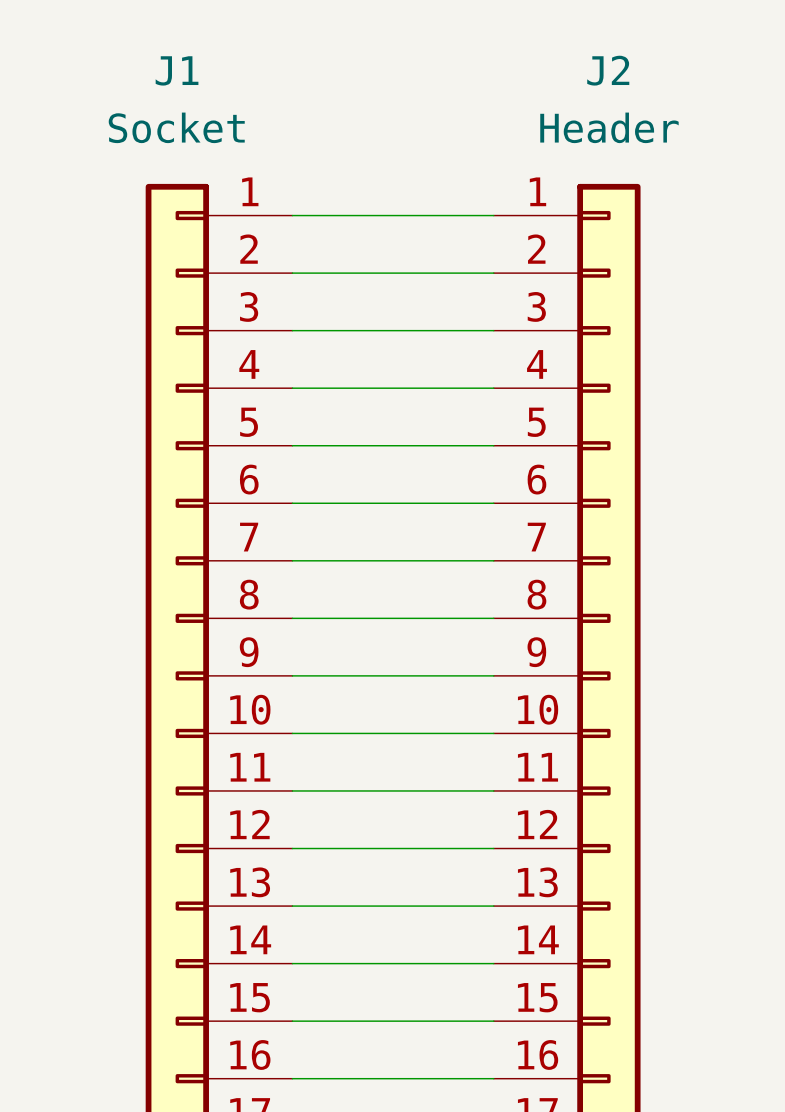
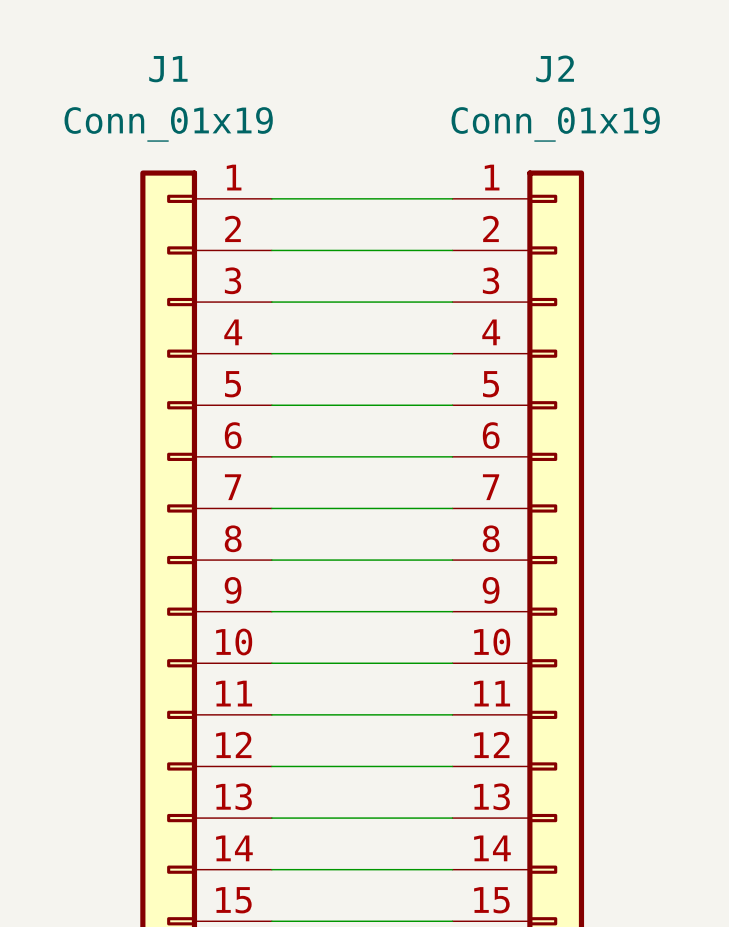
J1 value: Socket (176, 127) -> Conn_01x19 (168, 124)
J2 value: Header (609, 127) -> Conn_01x19 (555, 124)

